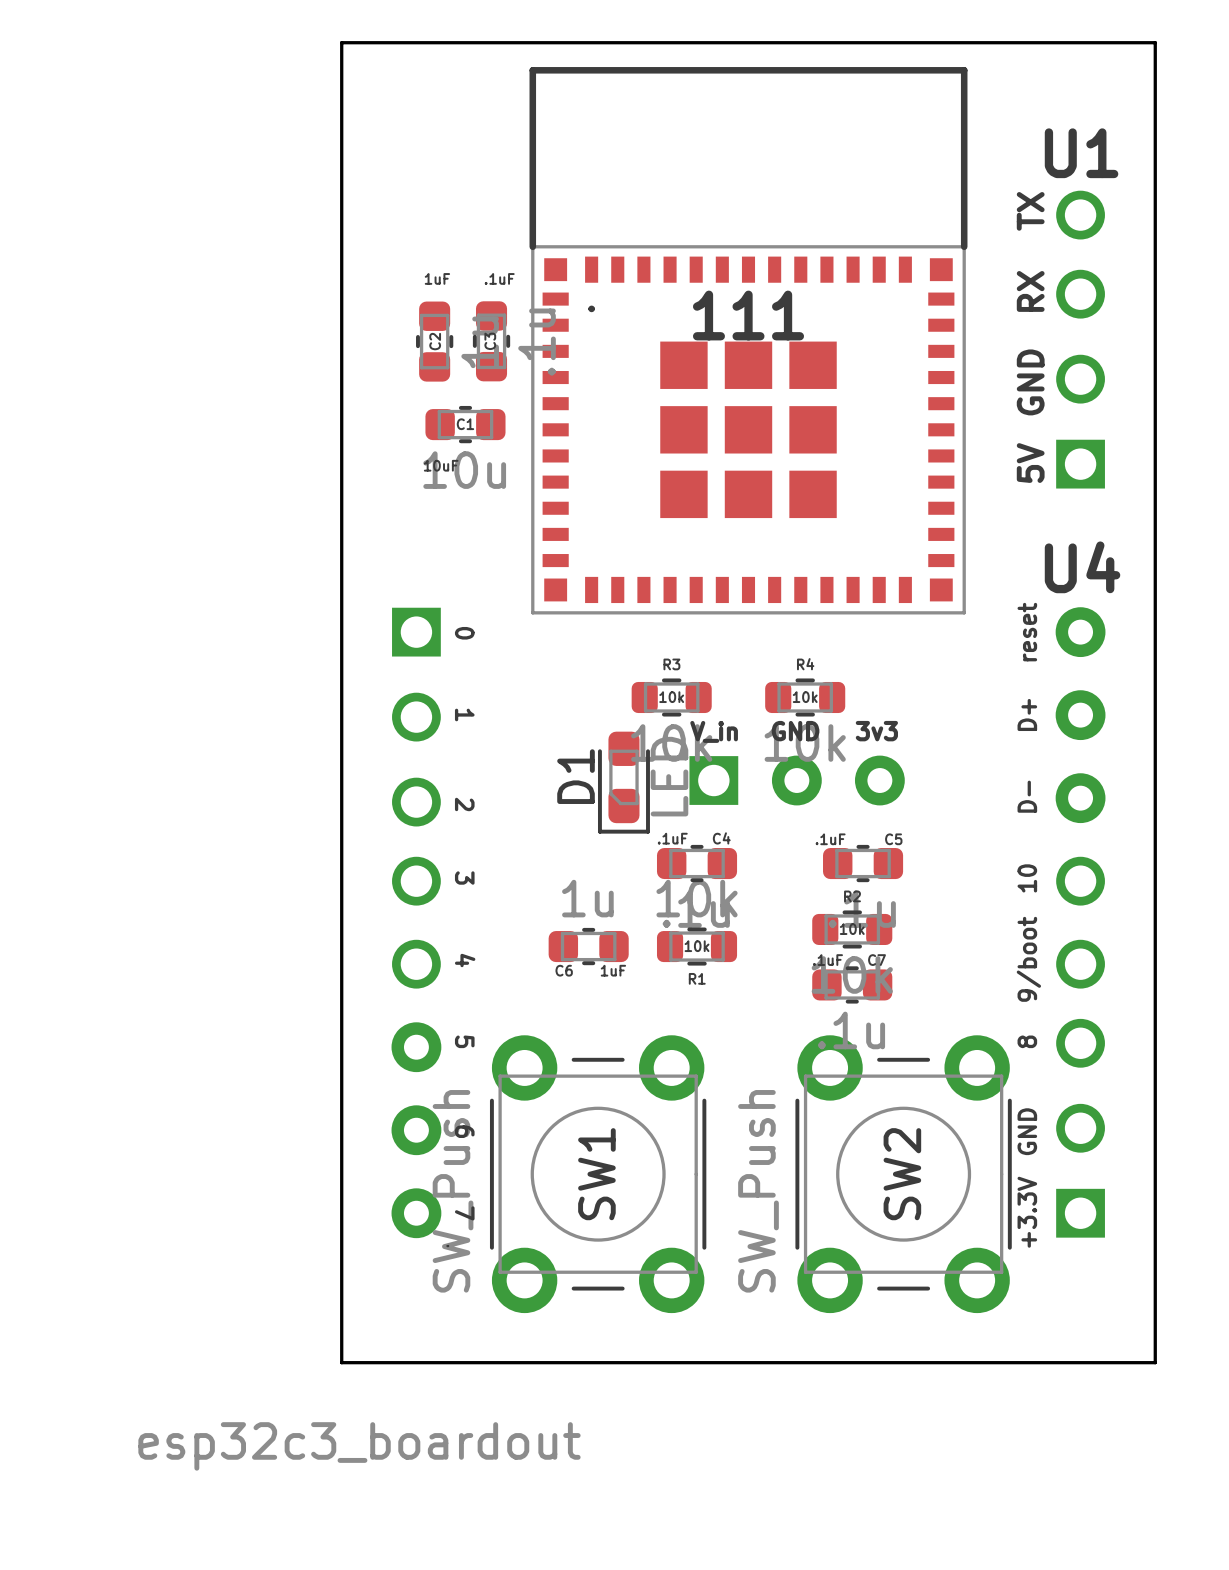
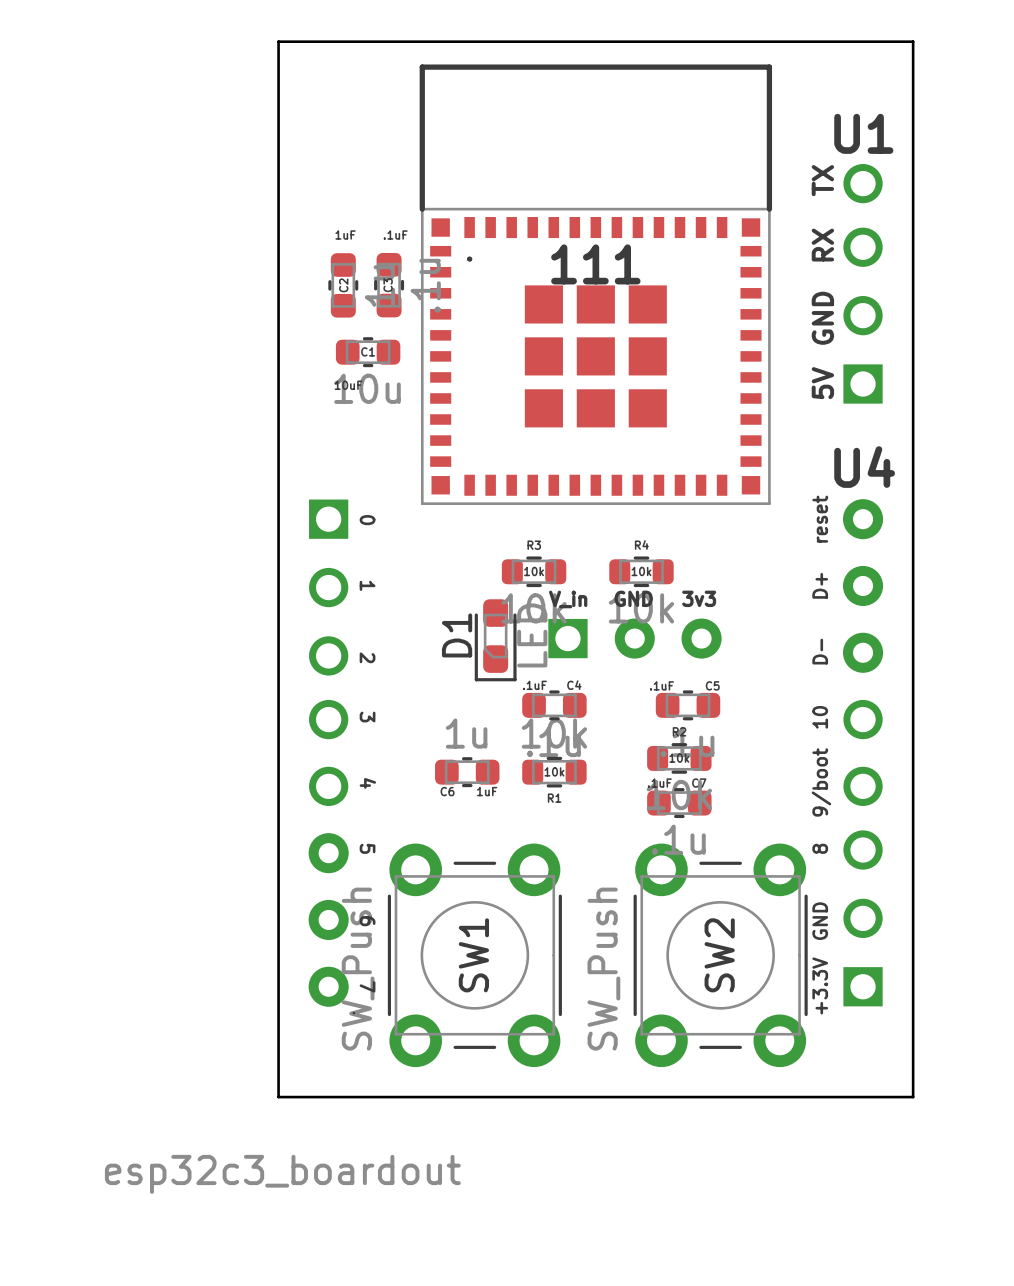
board edge: (341, 42) (1155, 42) (1155, 1362) (341, 1362) (341, 42) -> (278, 41) (278, 1097) (913, 1097) (913, 41) (278, 41)

